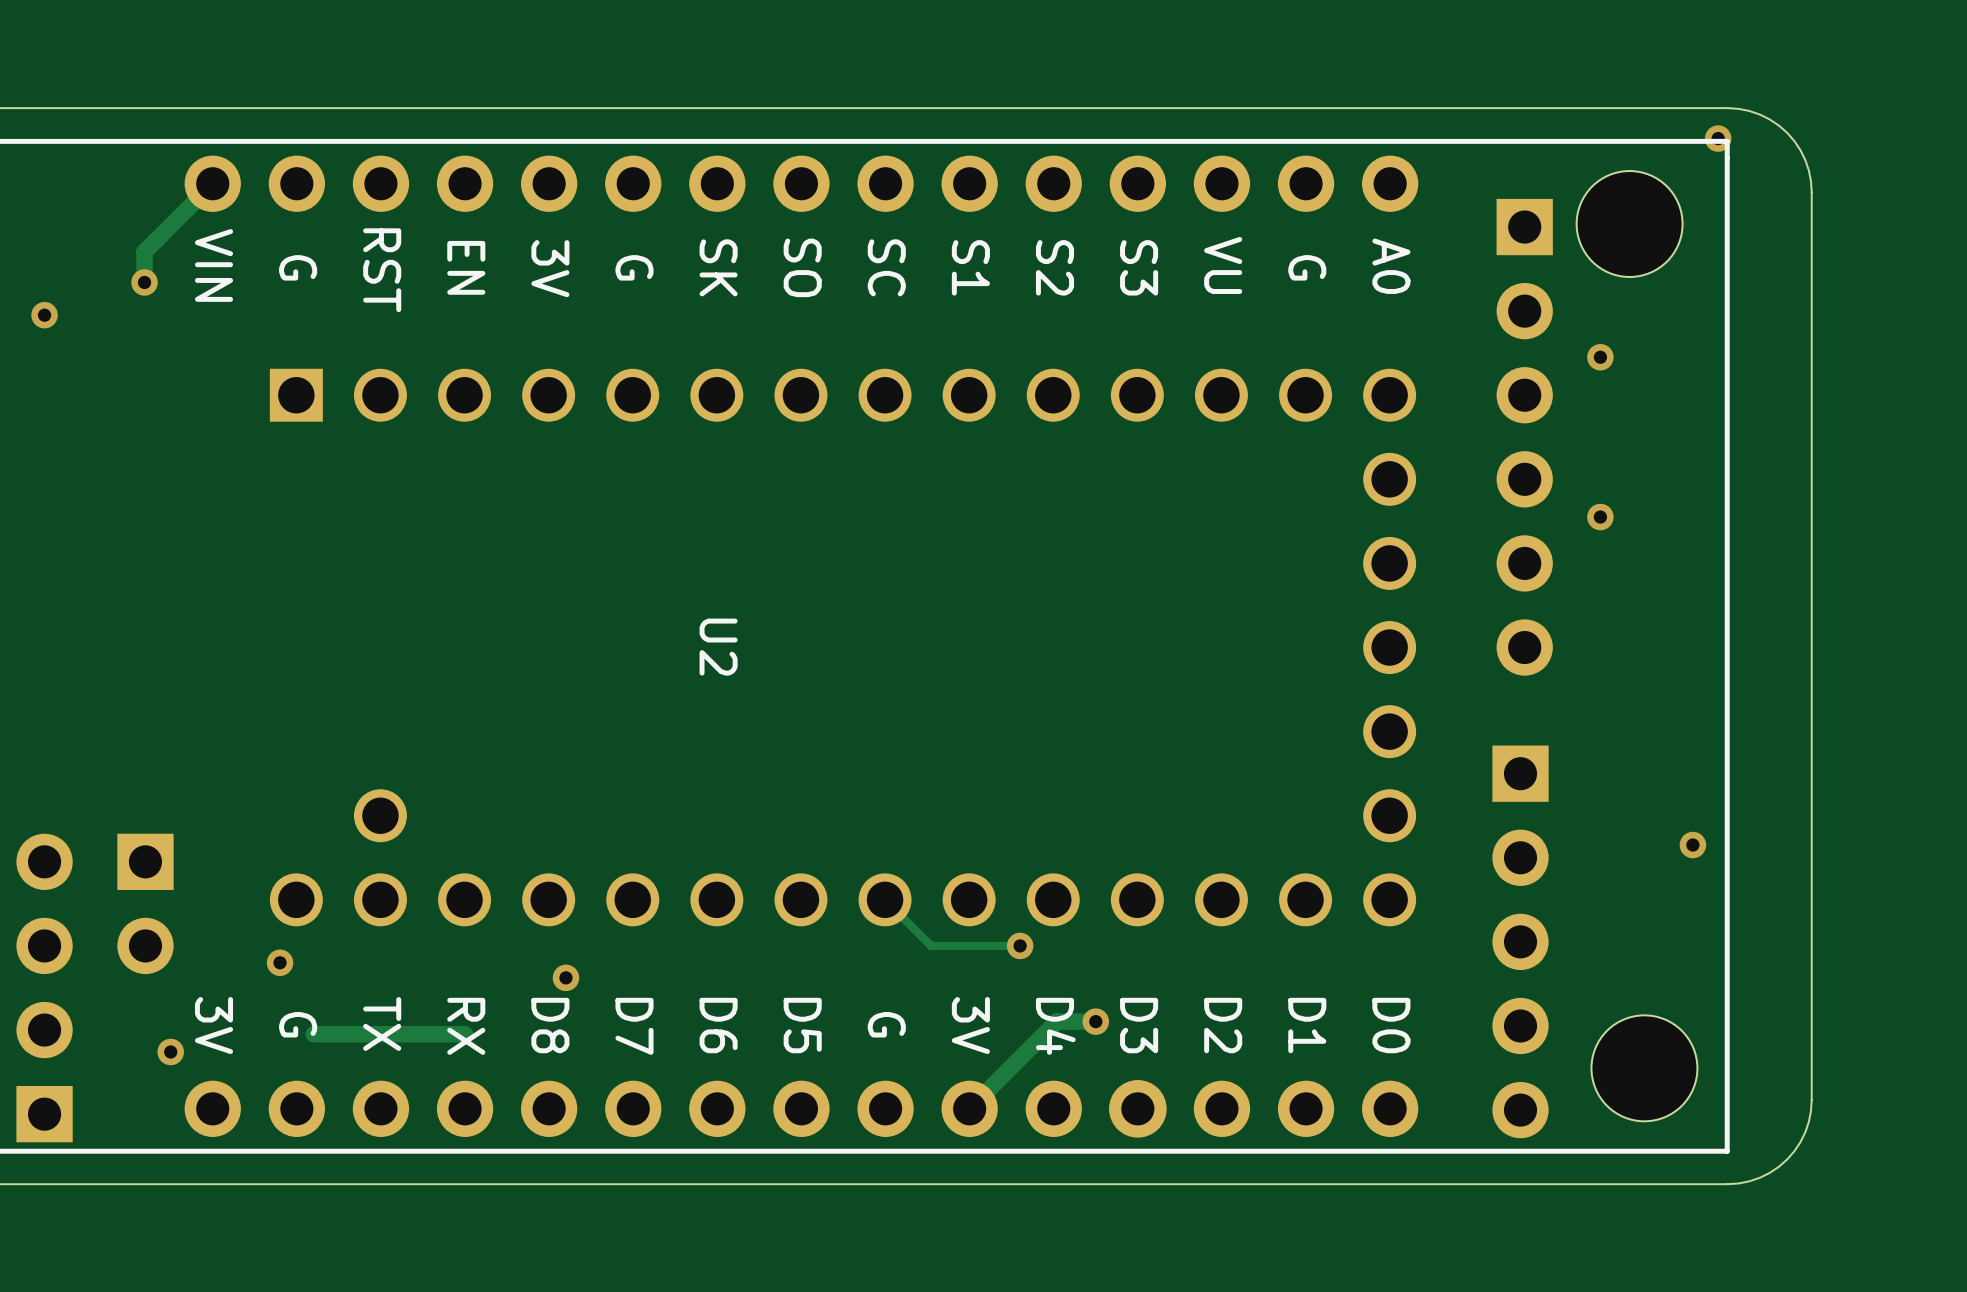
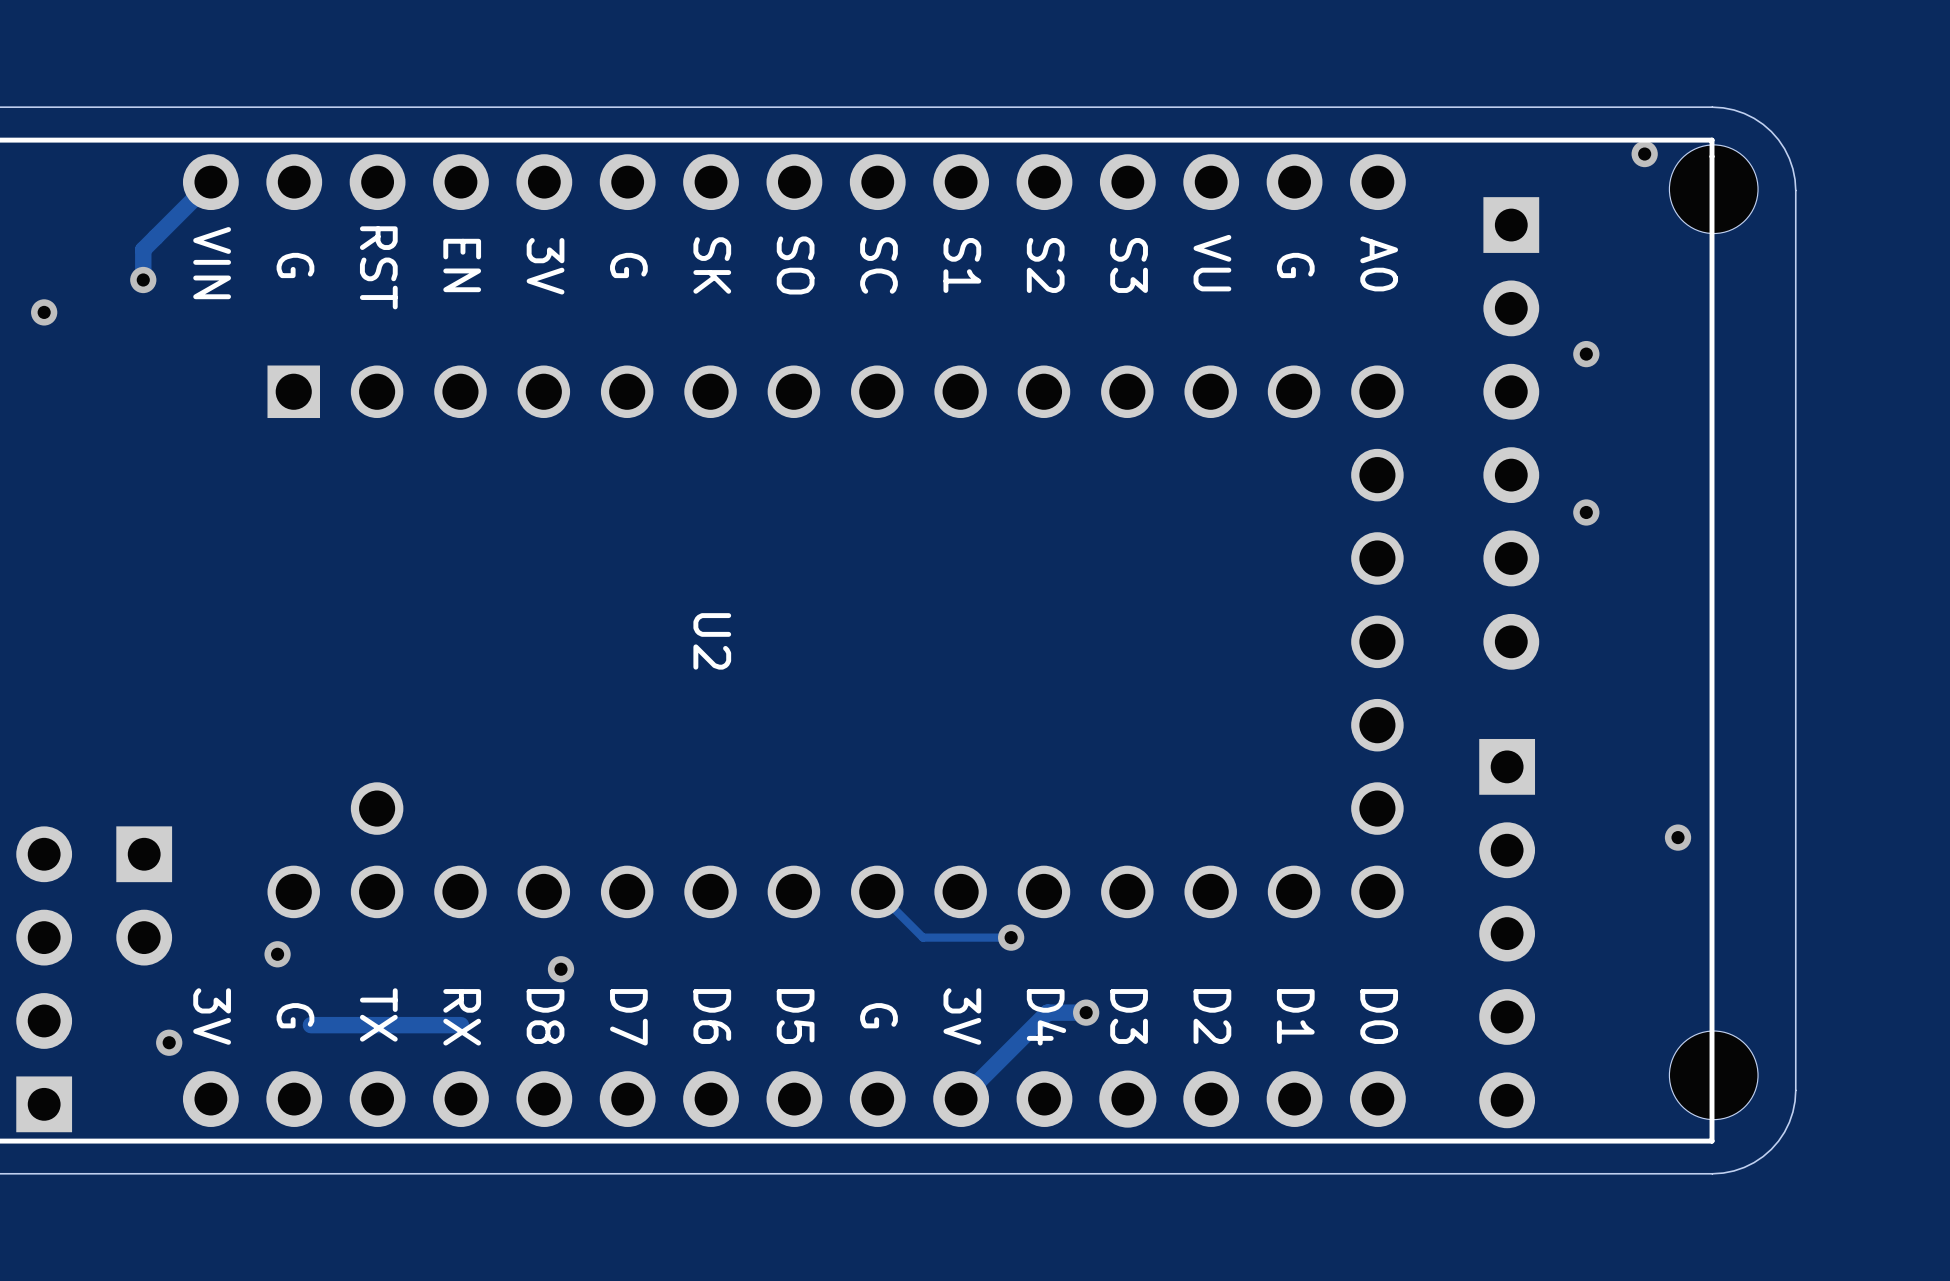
via position: (1718, 138) -> (1644, 154)
part: none -> (1713, 189)
part: (1629, 224) -> none
part: (1644, 1068) -> none
part: none -> (1713, 1075)

